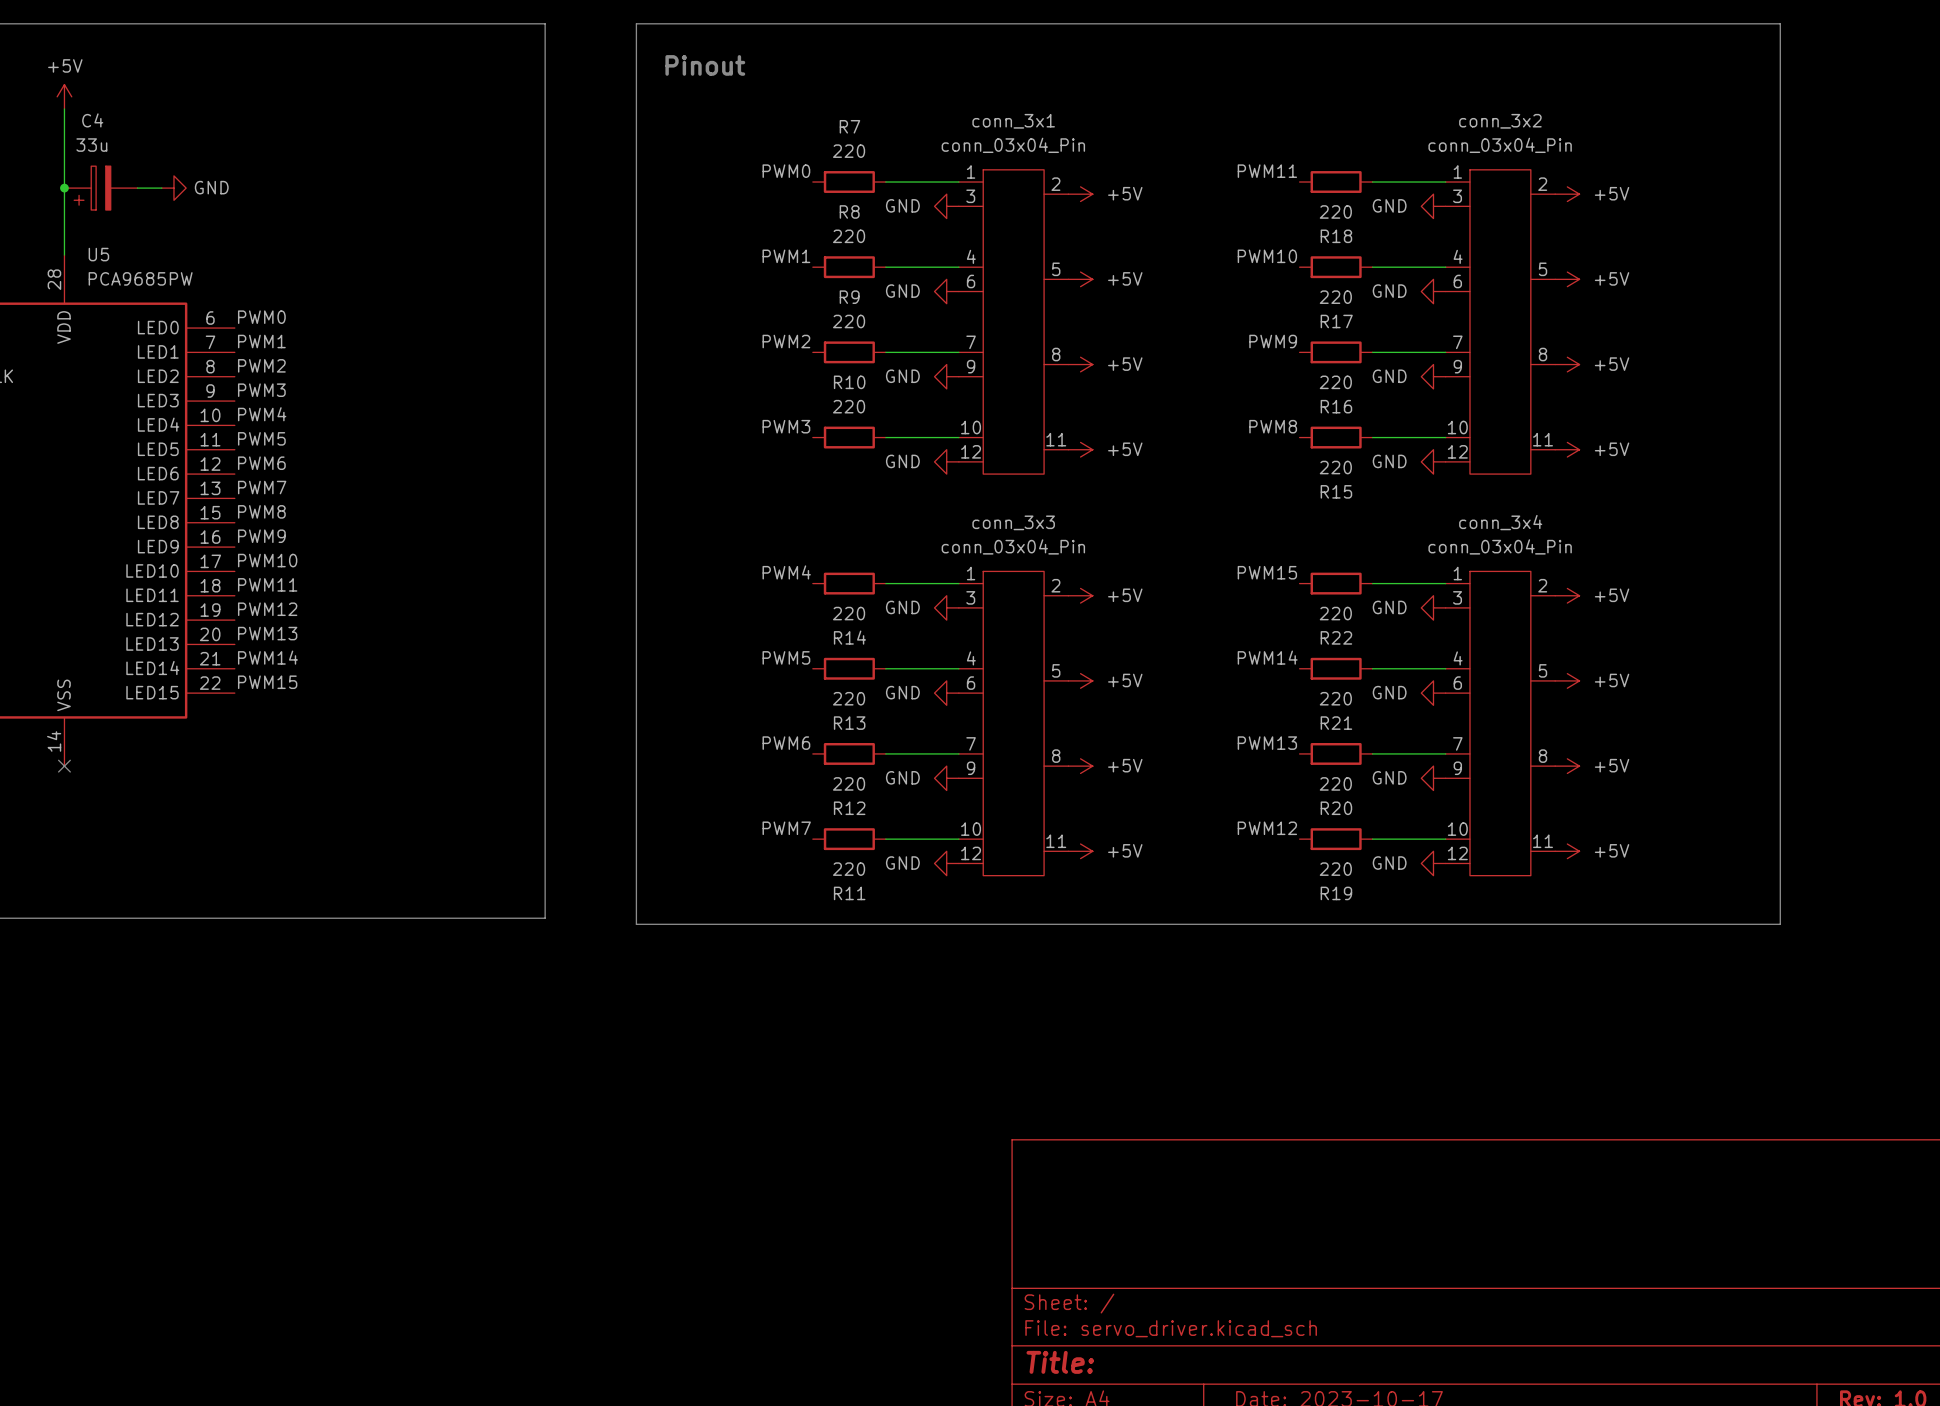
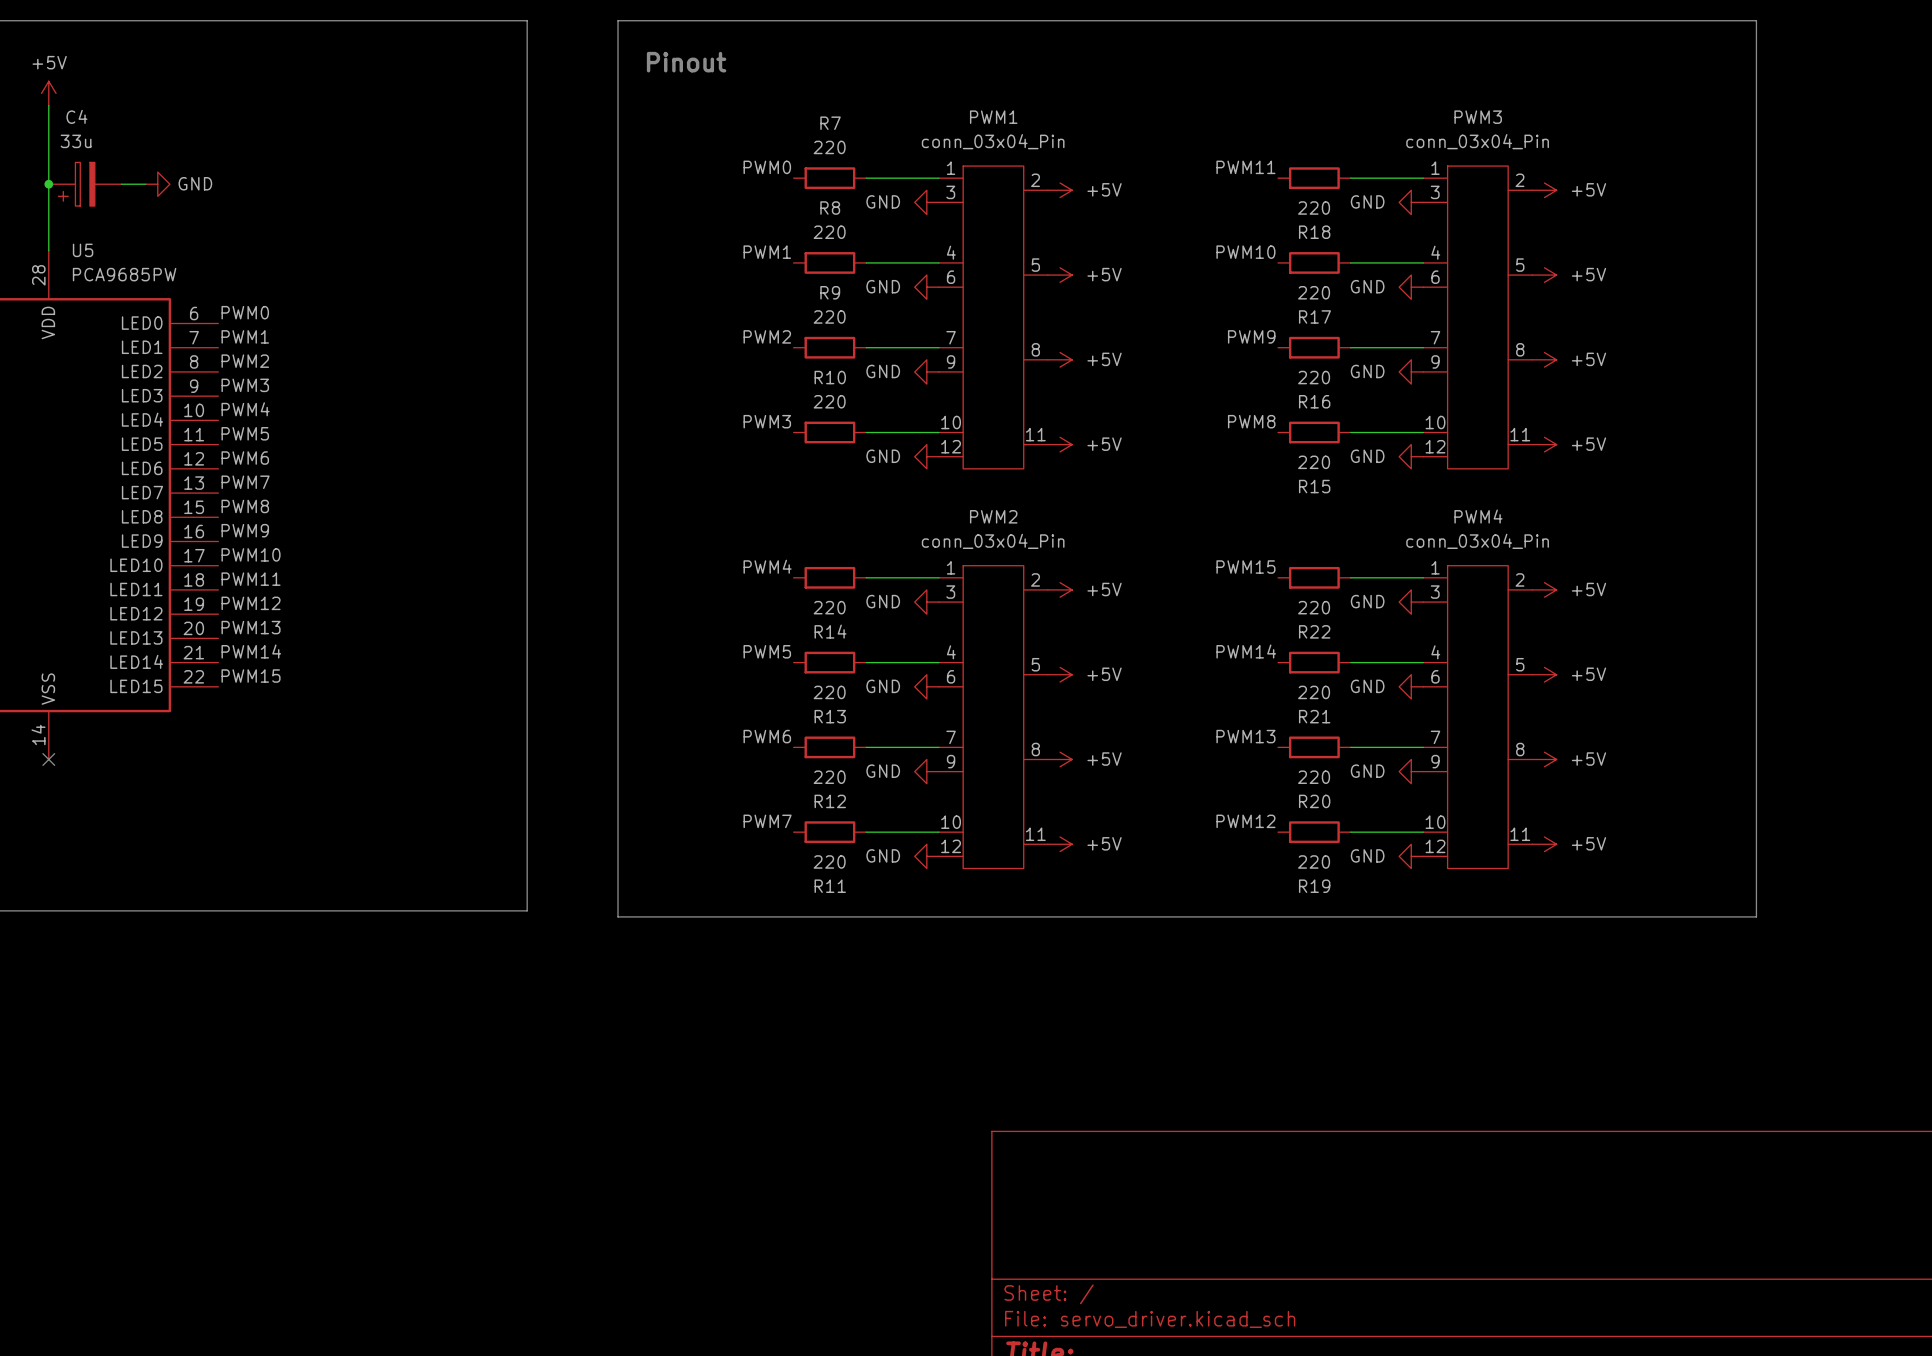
conn_3x1 name: conn_3x1 (1013, 121) -> PWM1 (993, 117)
conn_3x2 name: conn_3x2 (1500, 121) -> PWM3 (1478, 117)
conn_3x3 name: conn_3x3 (1013, 522) -> PWM2 (993, 516)
conn_3x4 name: conn_3x4 (1500, 522) -> PWM4 (1478, 516)

